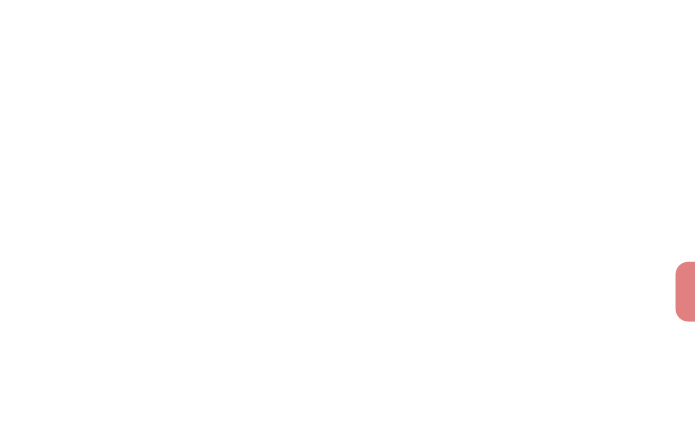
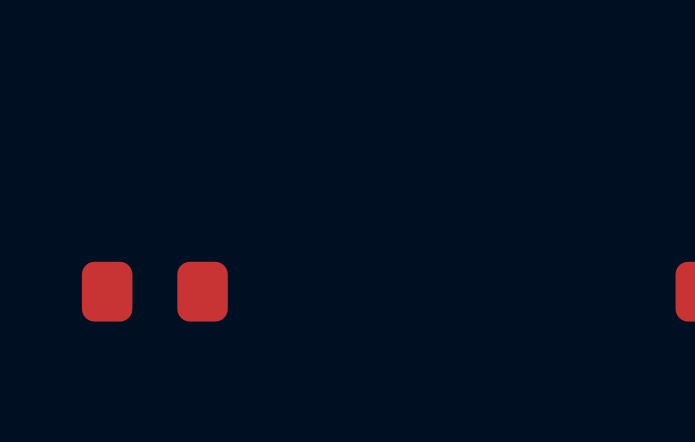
part: none -> (154, 291)

